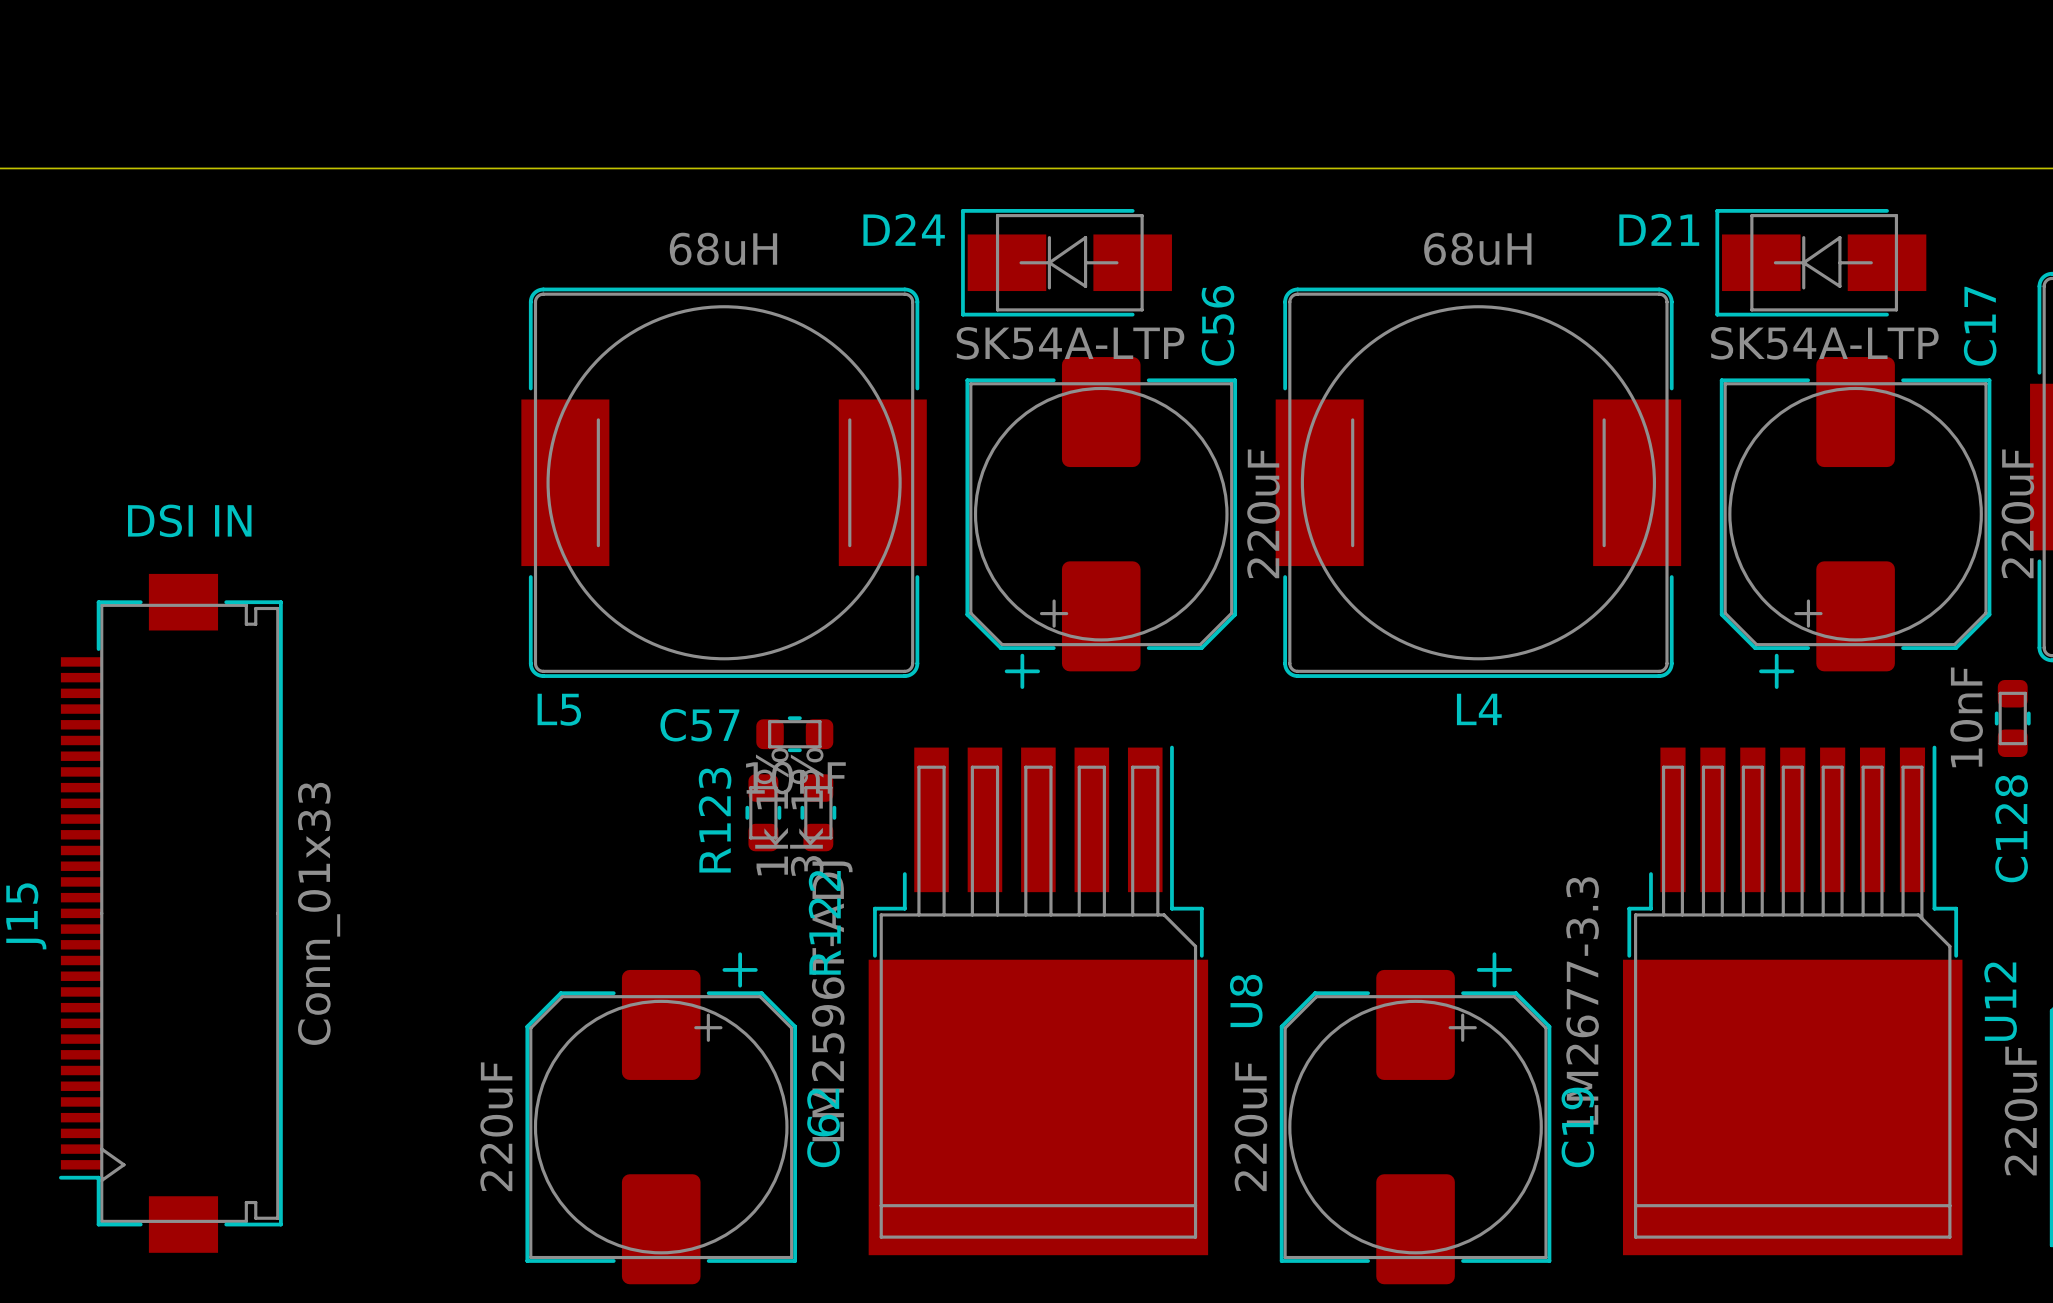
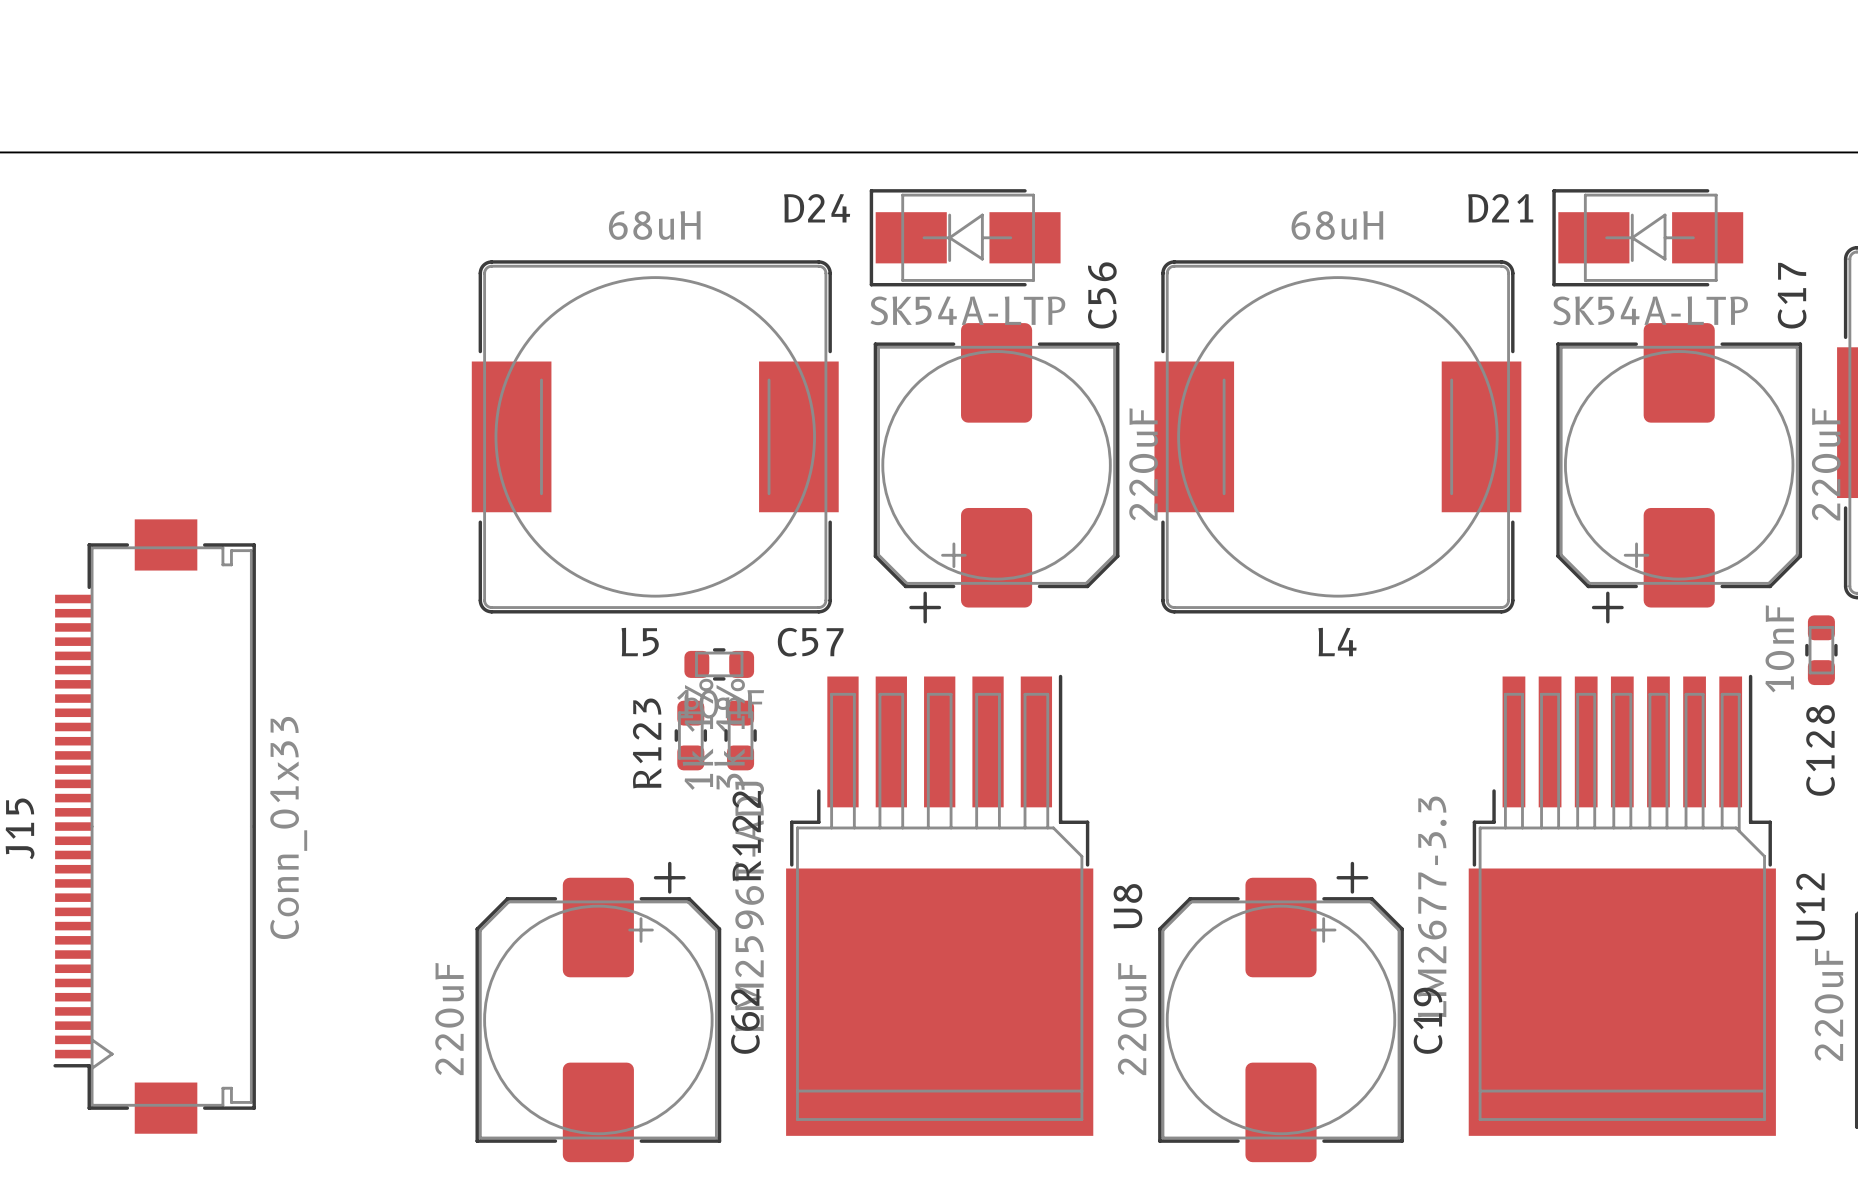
text: DSI IN (189, 520) -> none
L5 name position: L5 (559, 709) -> L5 (640, 642)
C57 name position: C57 (699, 725) -> C57 (810, 642)

